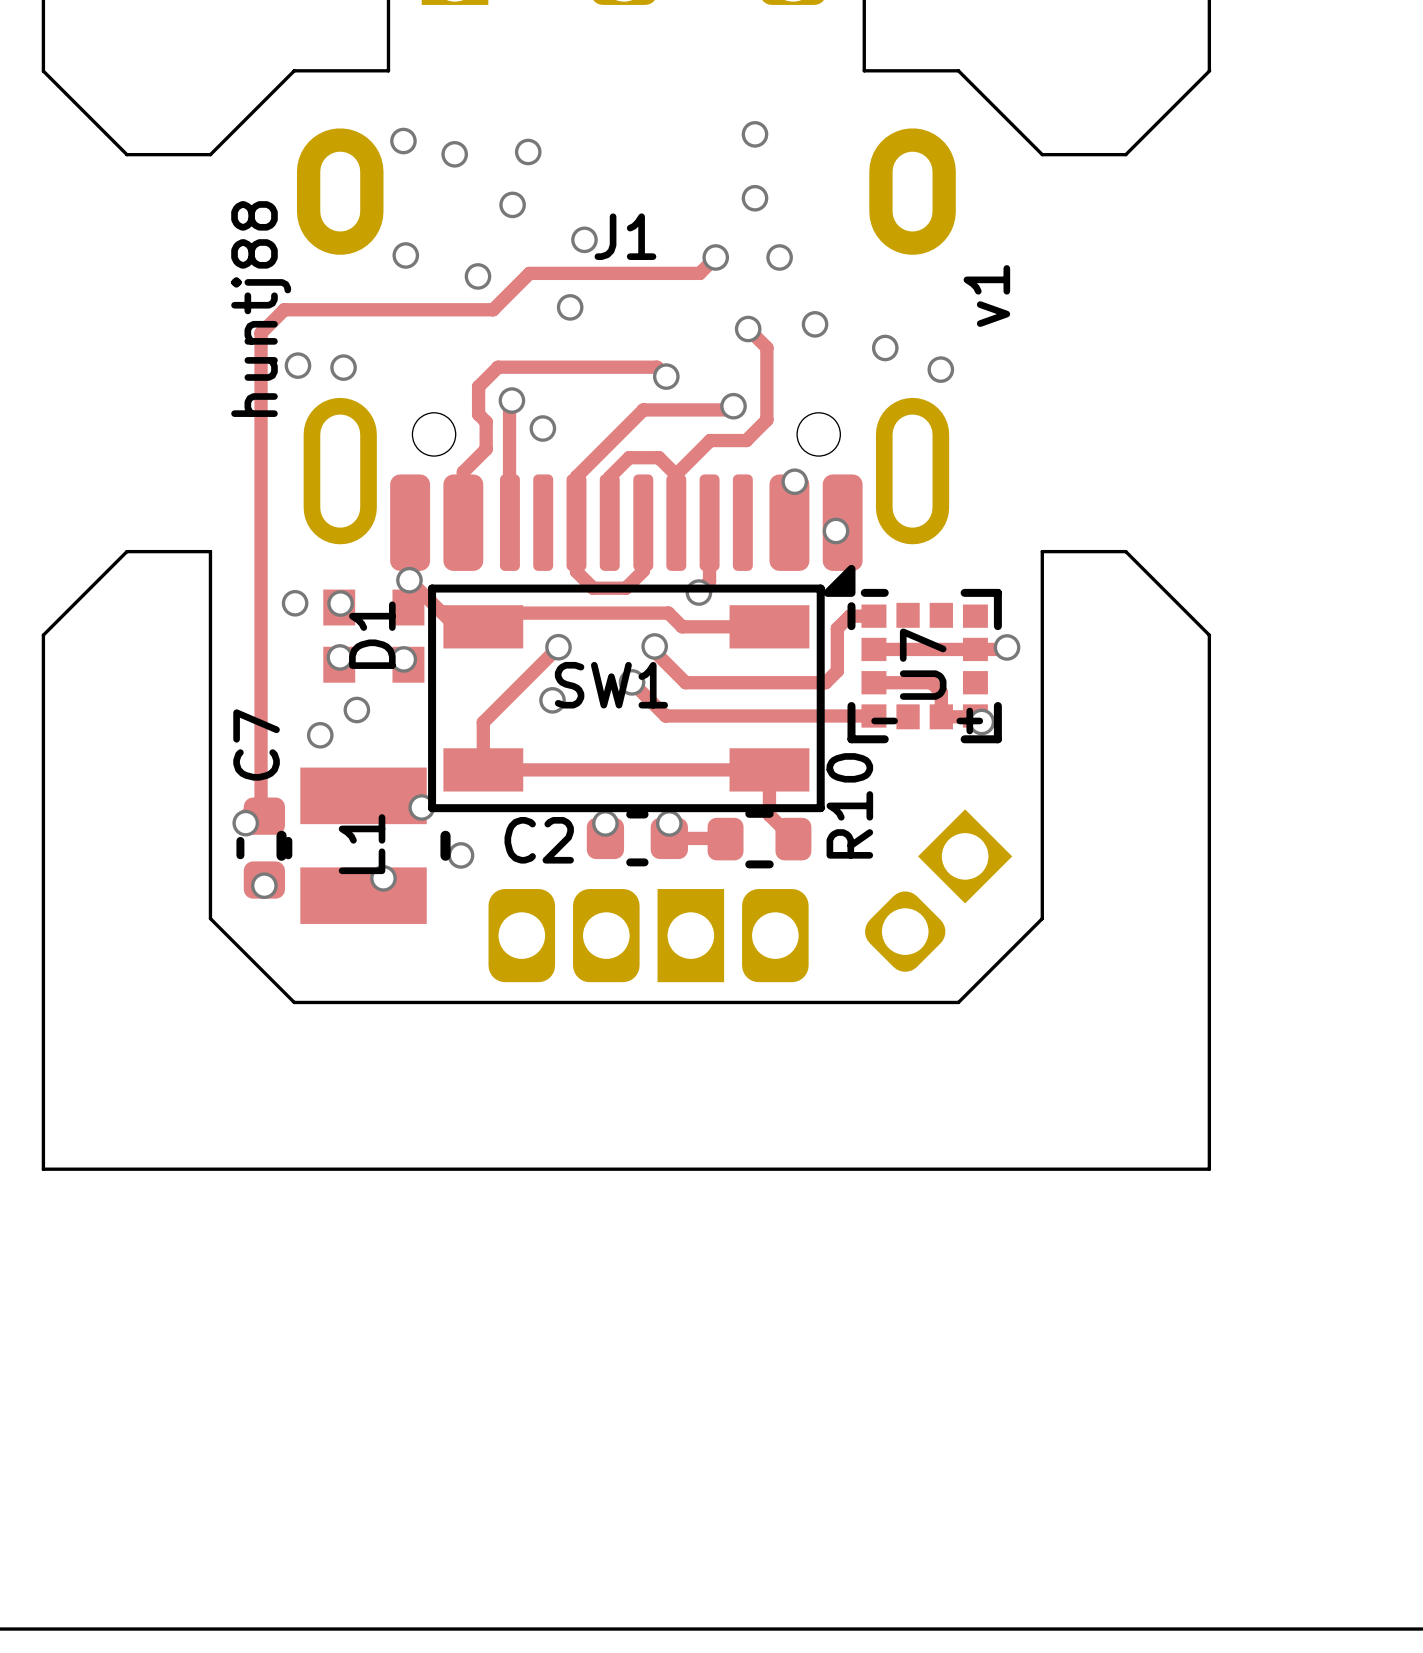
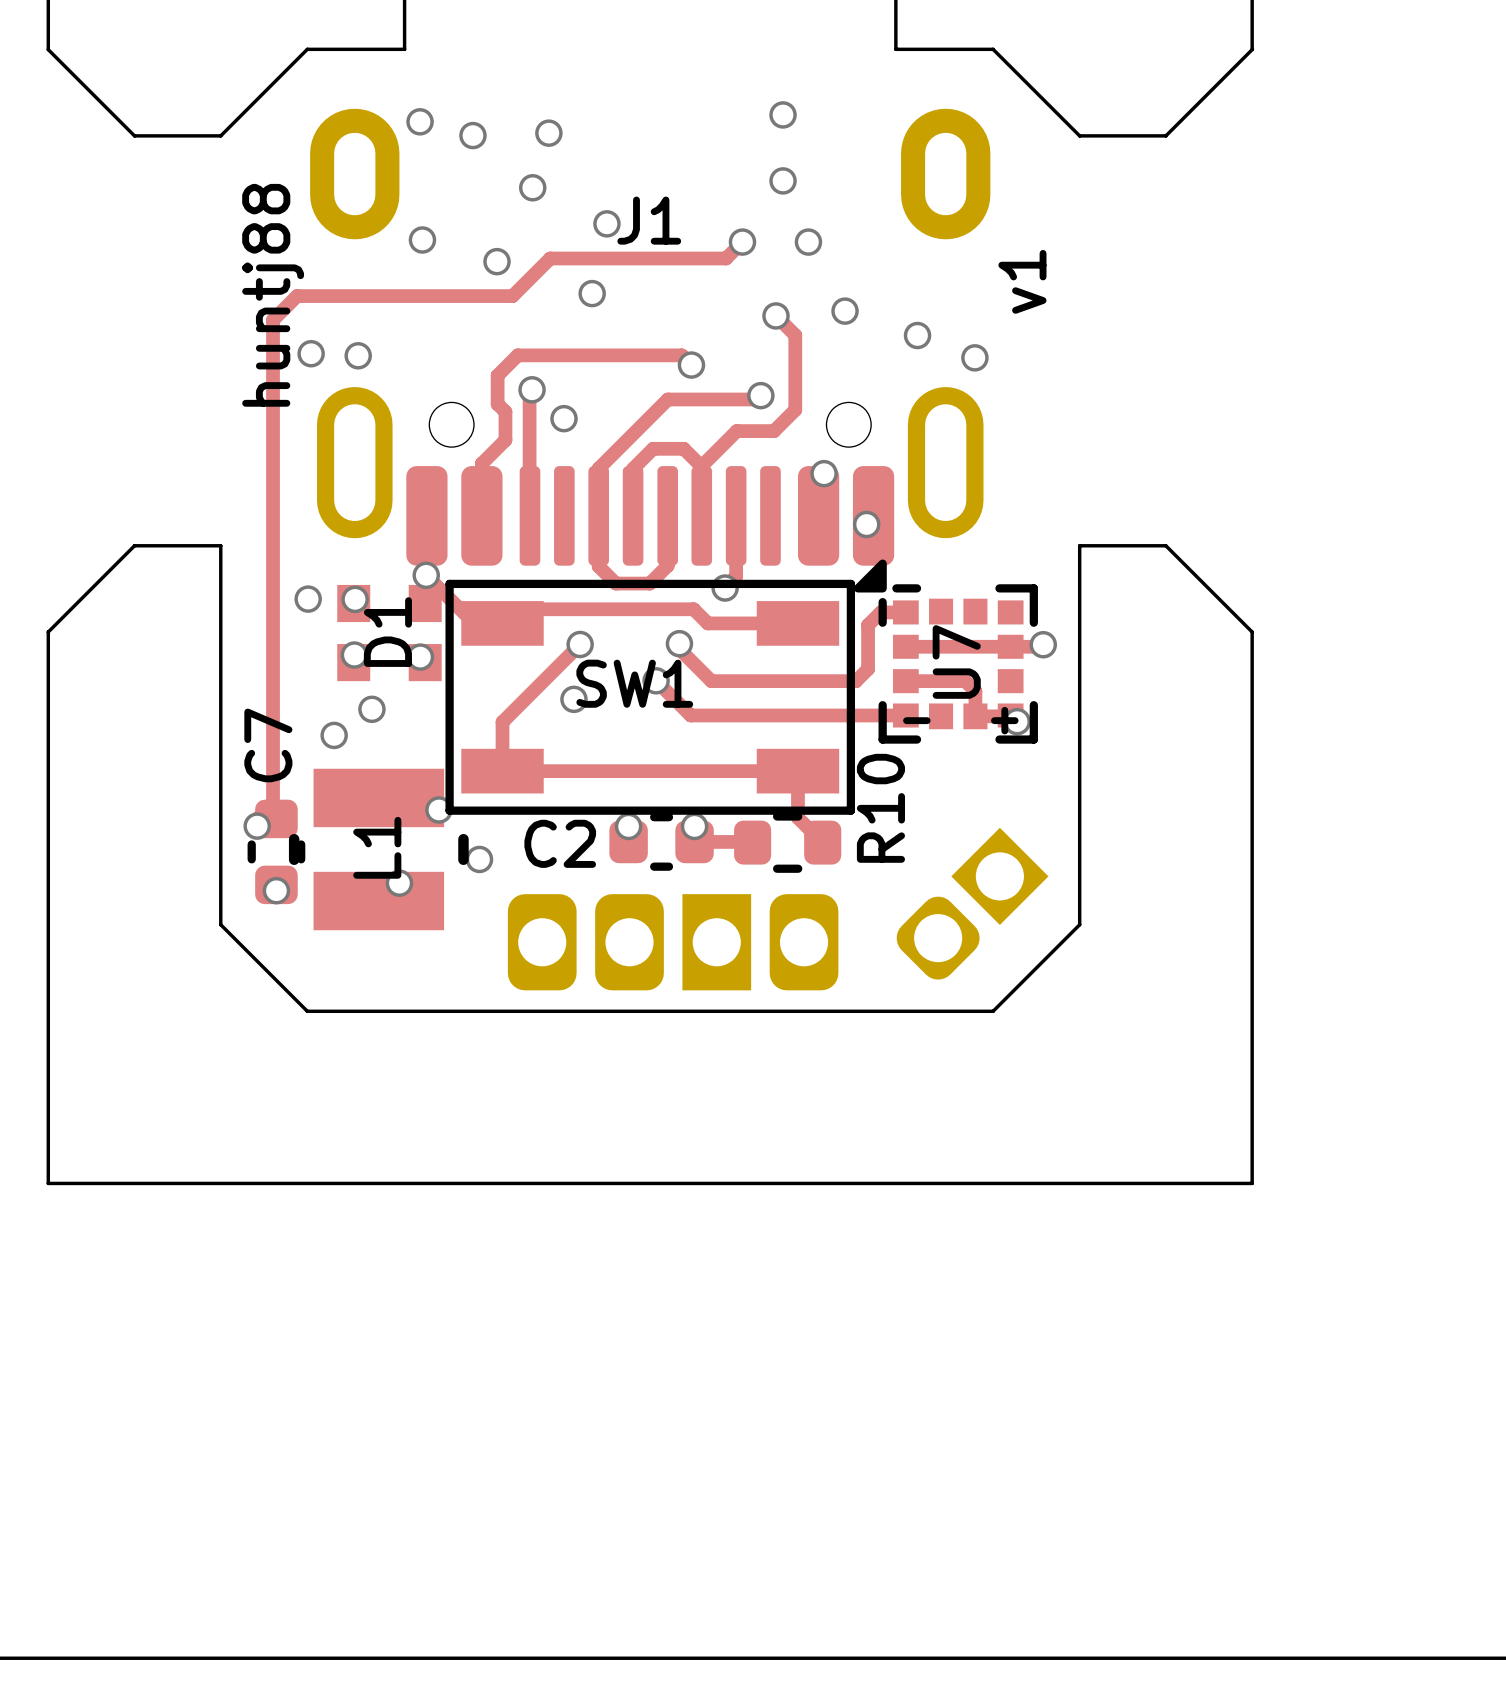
part position: (965, 856) -> (999, 876)

